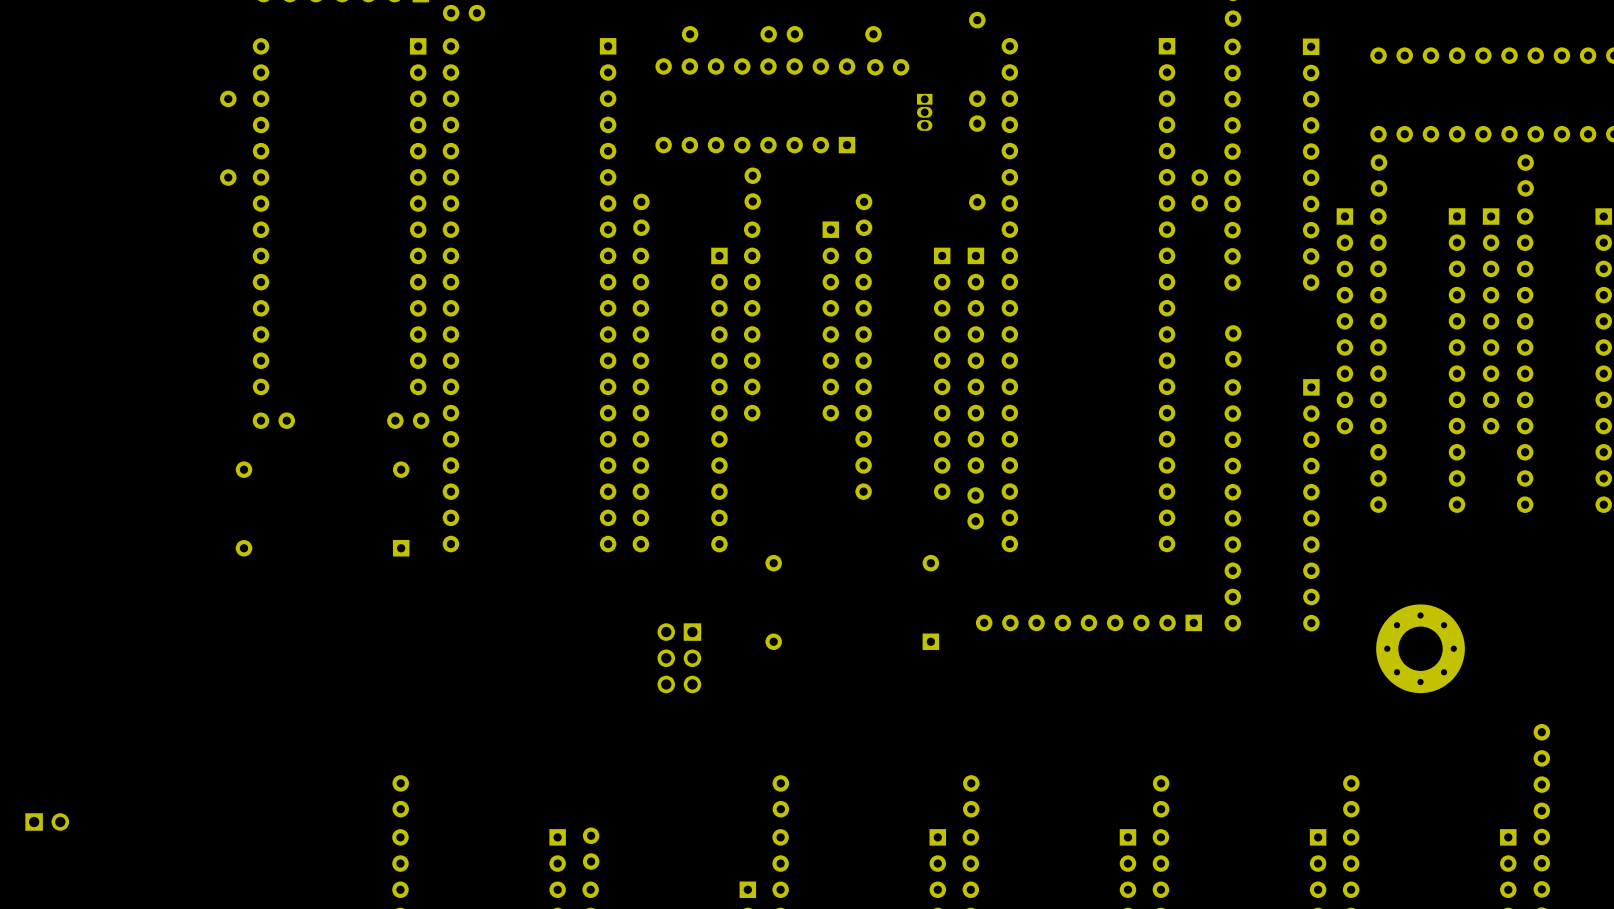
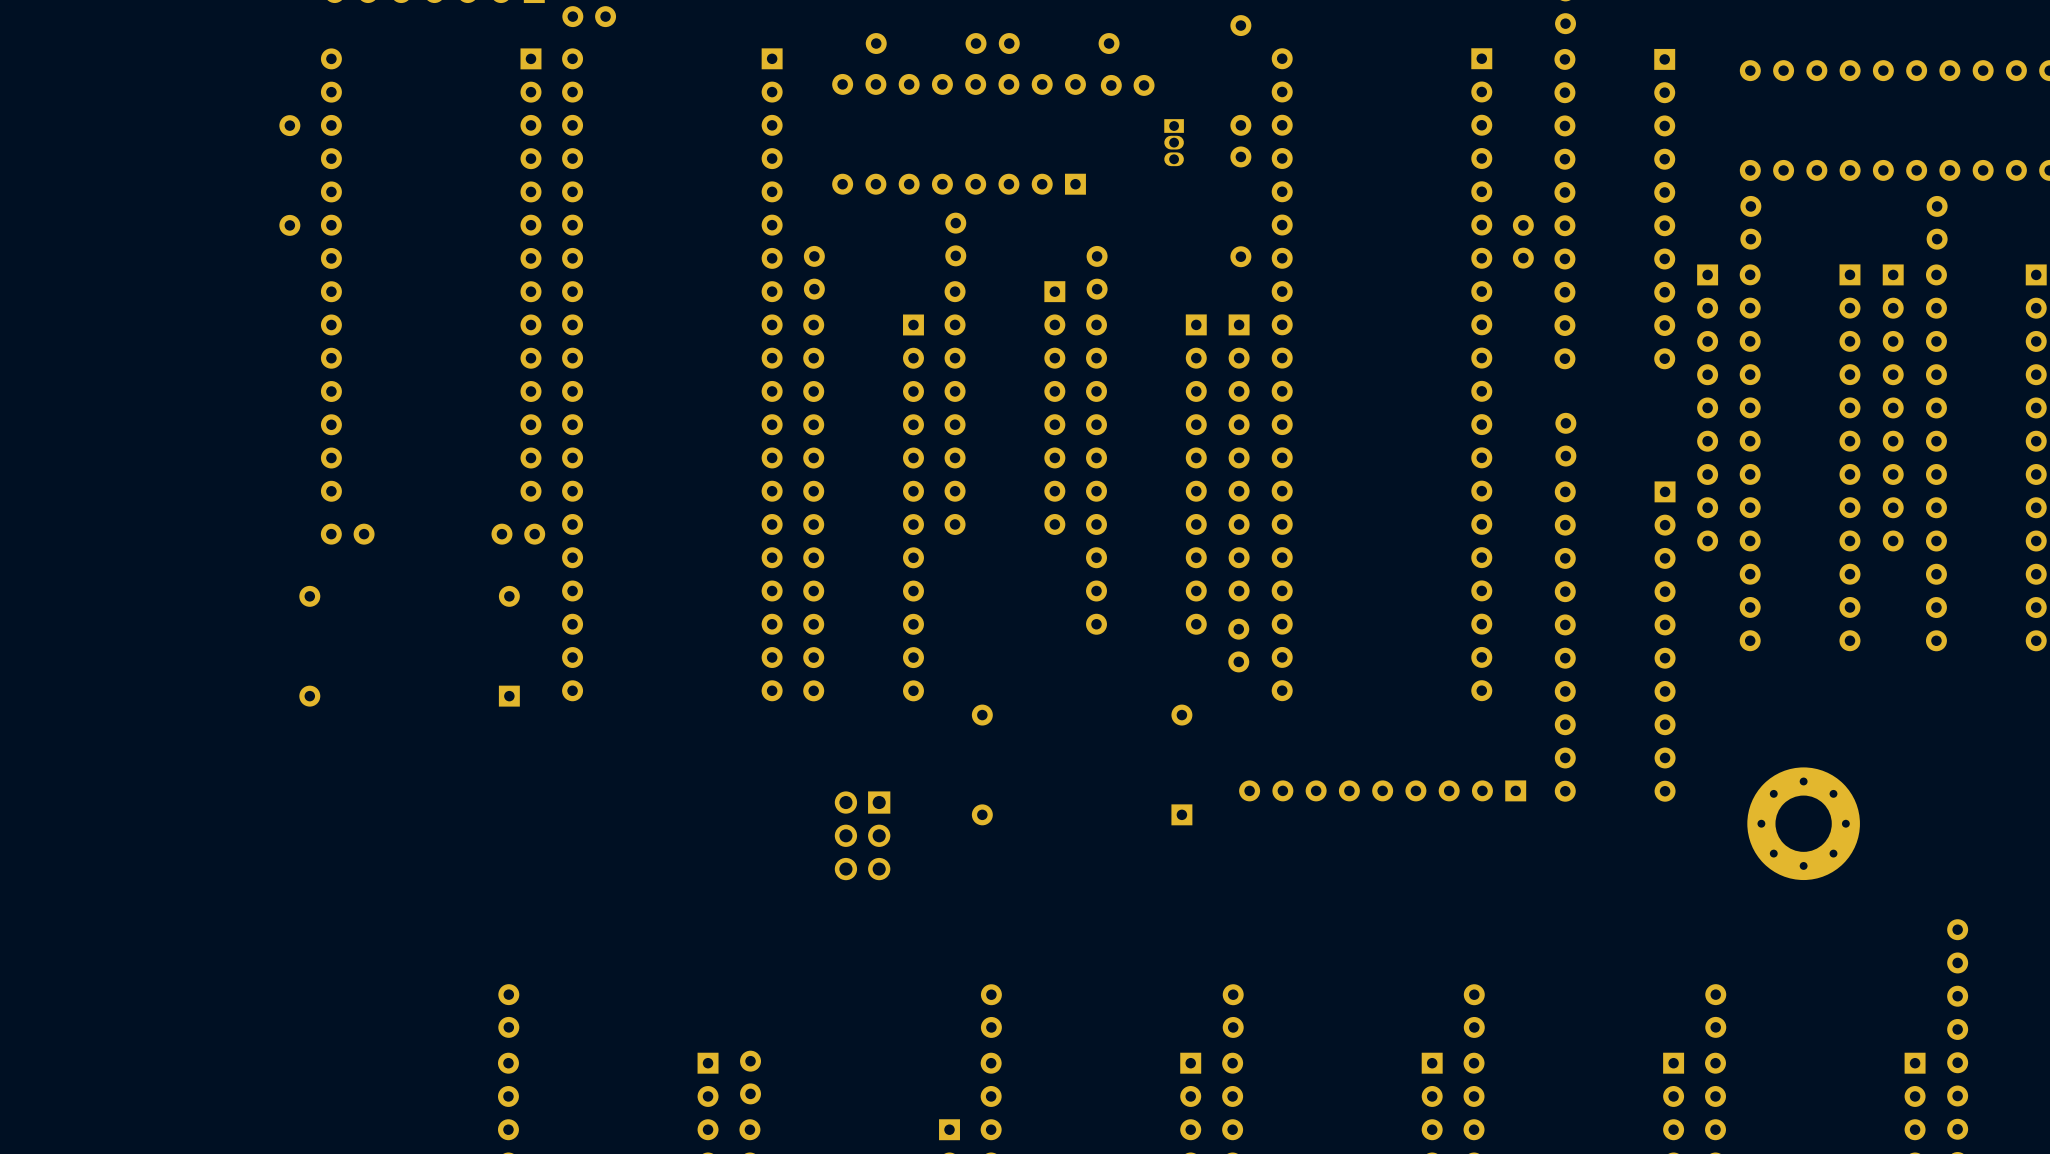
part: (47, 821) -> none

